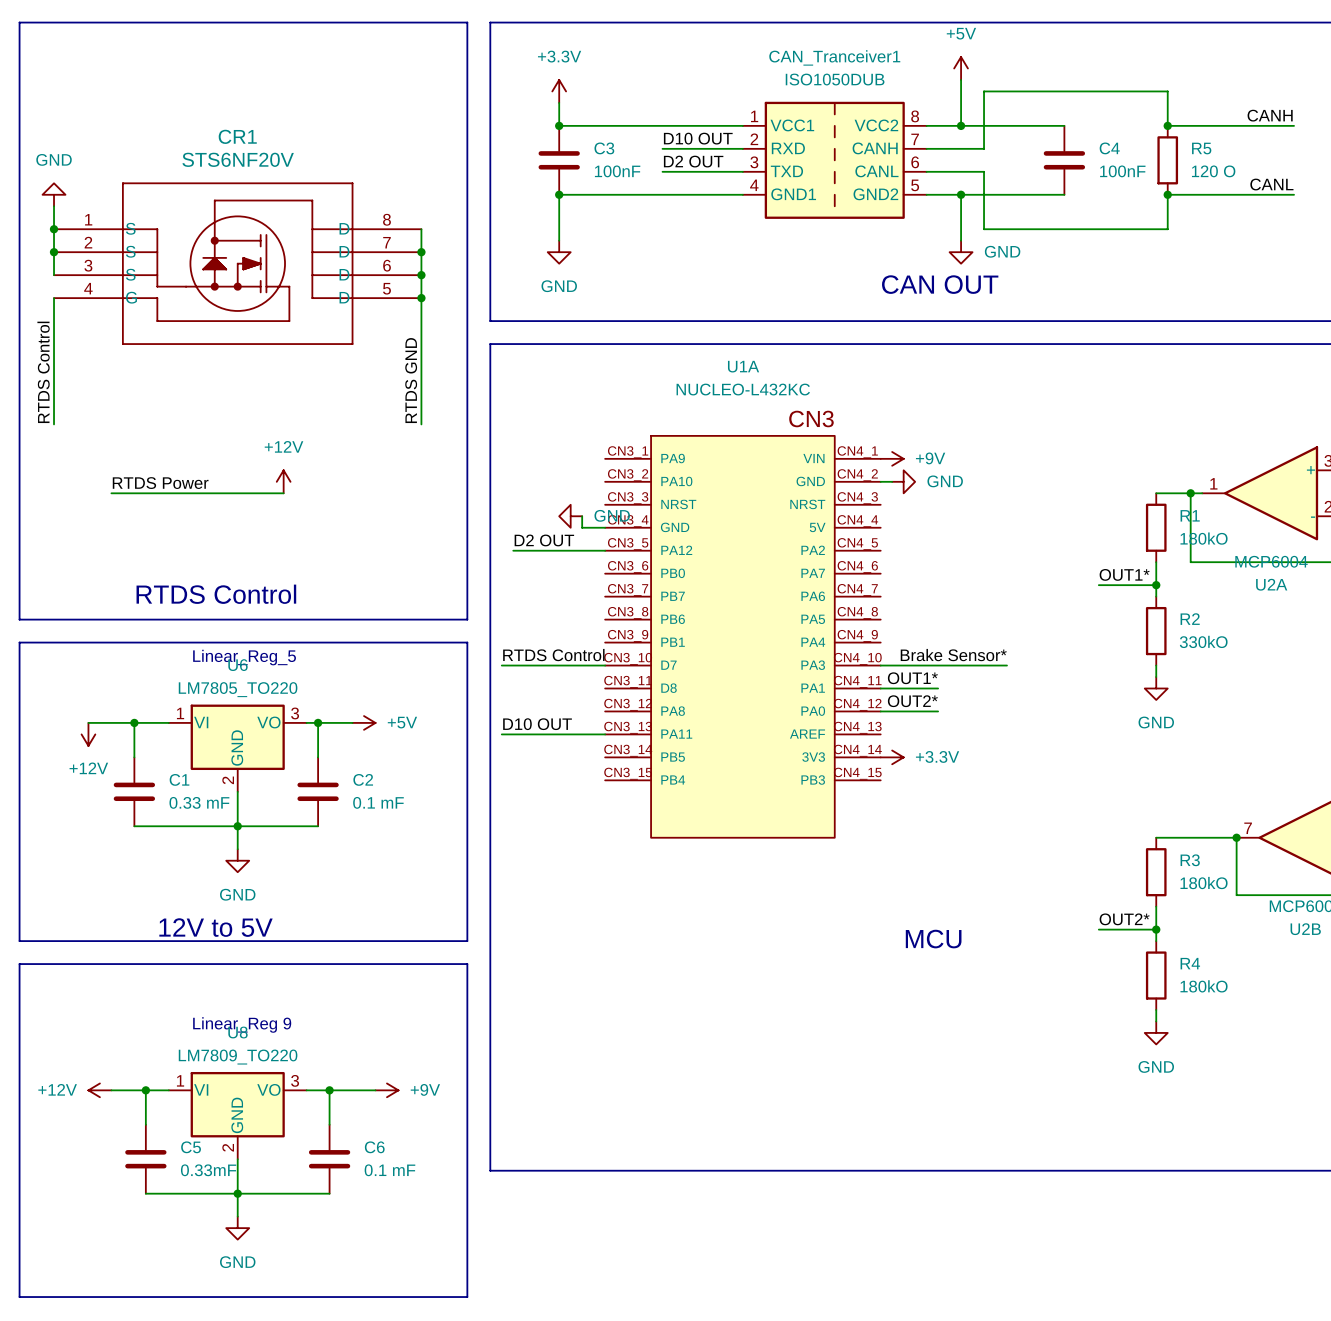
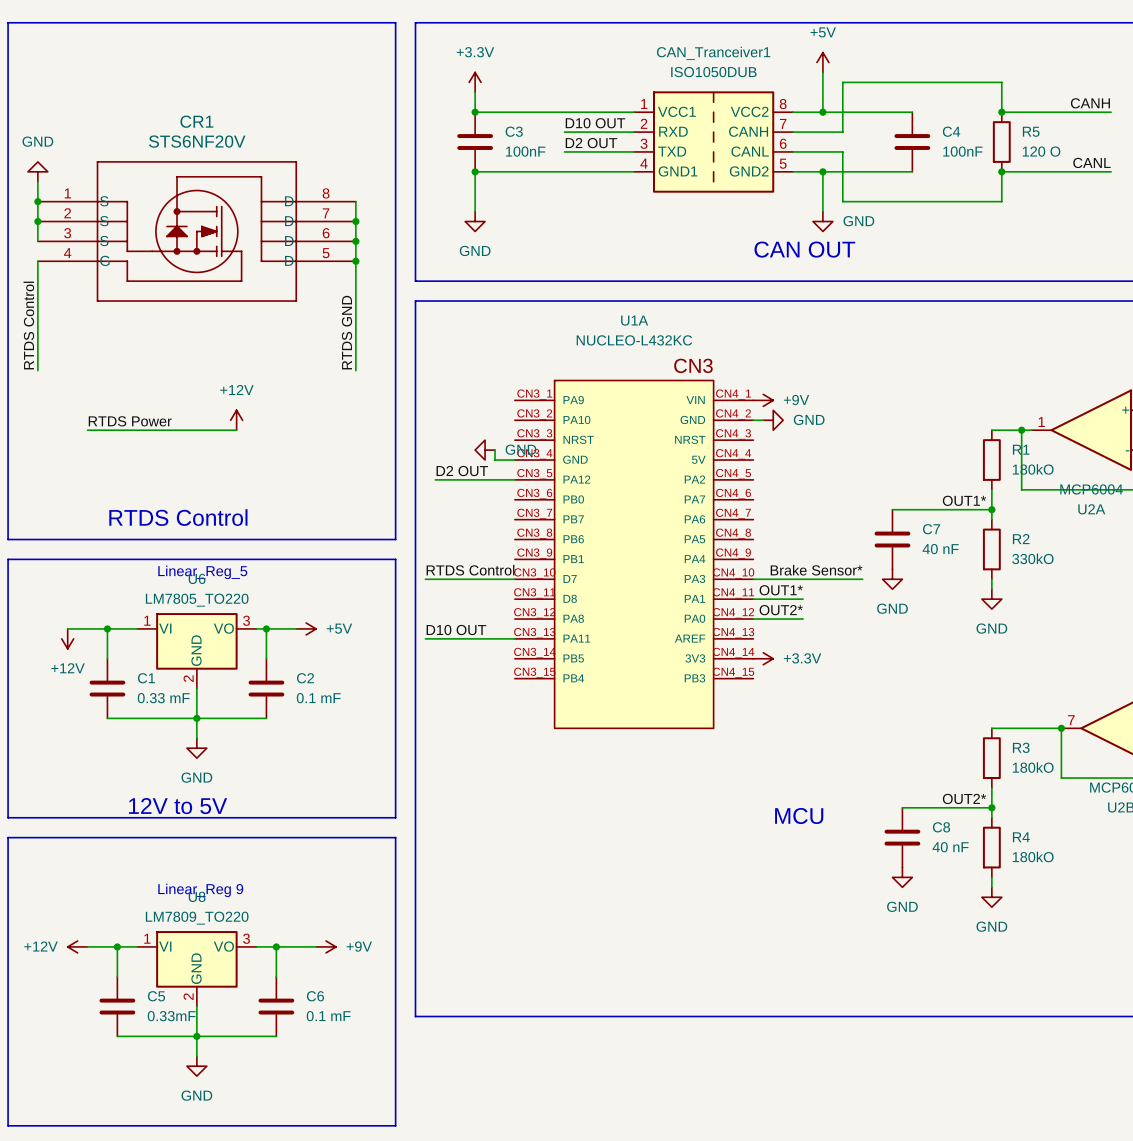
wire: none -> (892, 509) (942, 509)
C7: none -> 40 nF (892, 539)
power symbol: none -> GND (892, 579)
wire: none -> (902, 807) (942, 807)
C8: none -> 40 nF (902, 837)
power symbol: none -> GND (902, 877)

